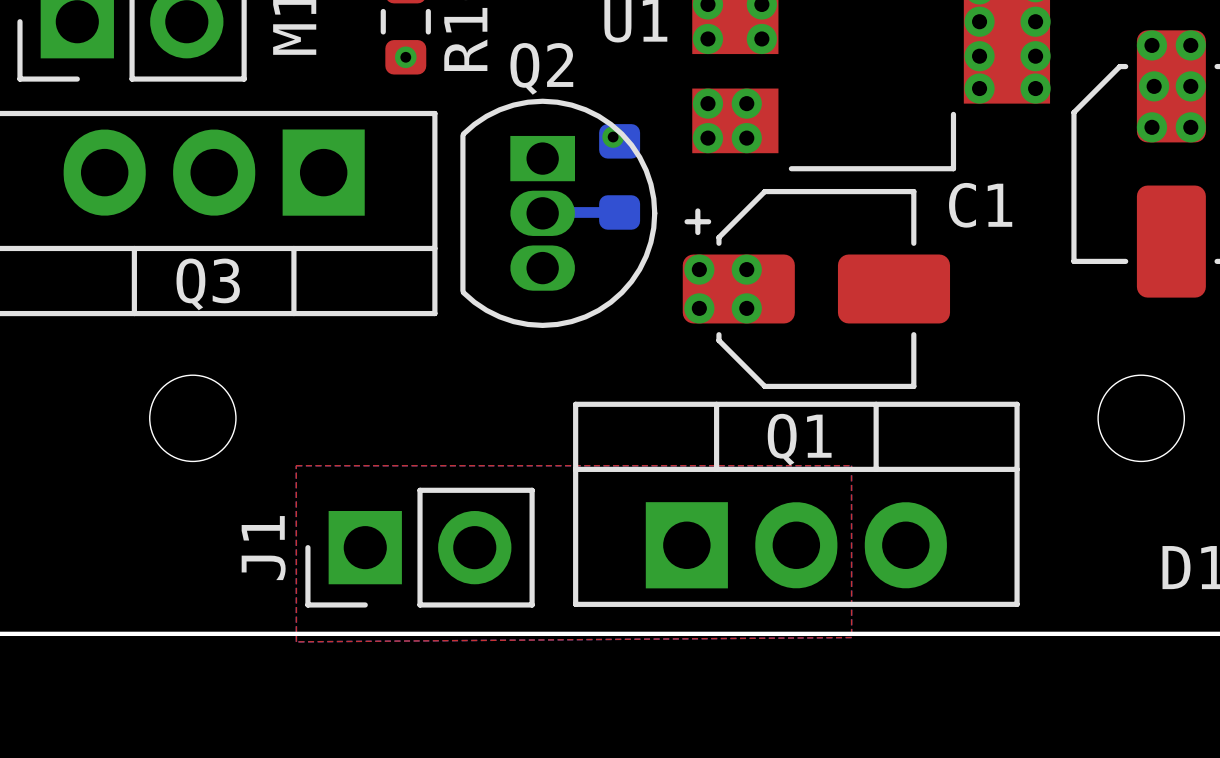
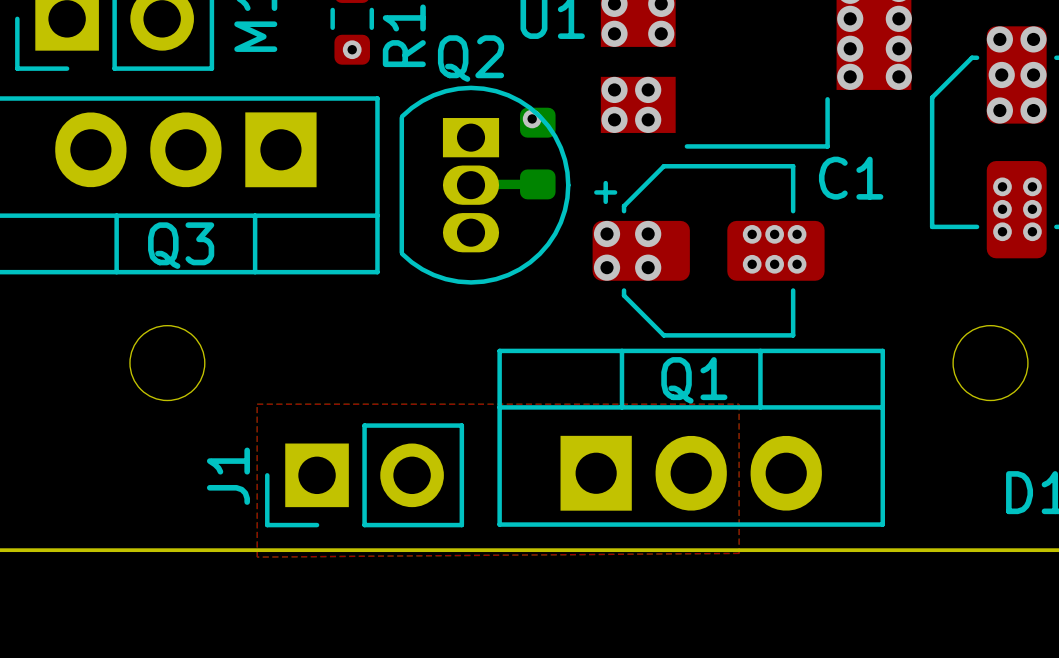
via: none -> (1002, 186)
via: none -> (1032, 186)
via: none -> (1002, 209)
via: none -> (1032, 209)
via: none -> (1002, 231)
via: none -> (1032, 231)
via: none -> (752, 234)
via: none -> (774, 234)
via: none -> (797, 234)
via: none -> (752, 264)
via: none -> (774, 264)
via: none -> (797, 264)

